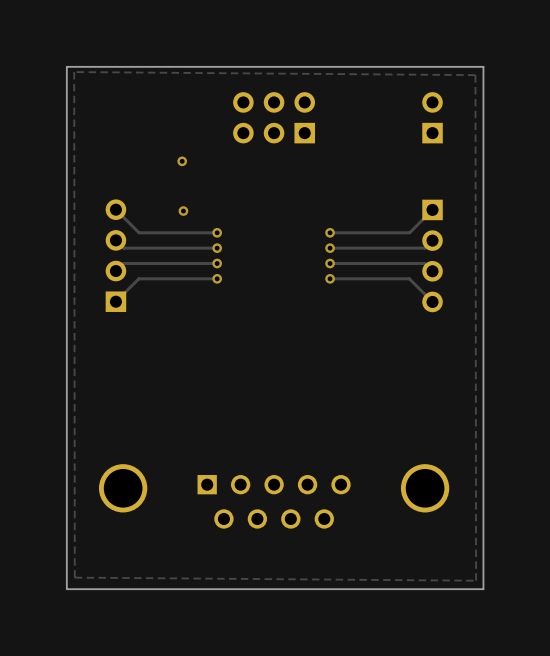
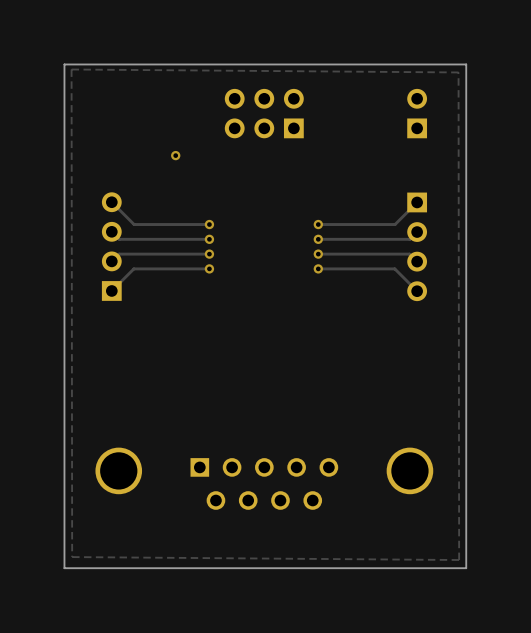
via: (183, 211) -> none

